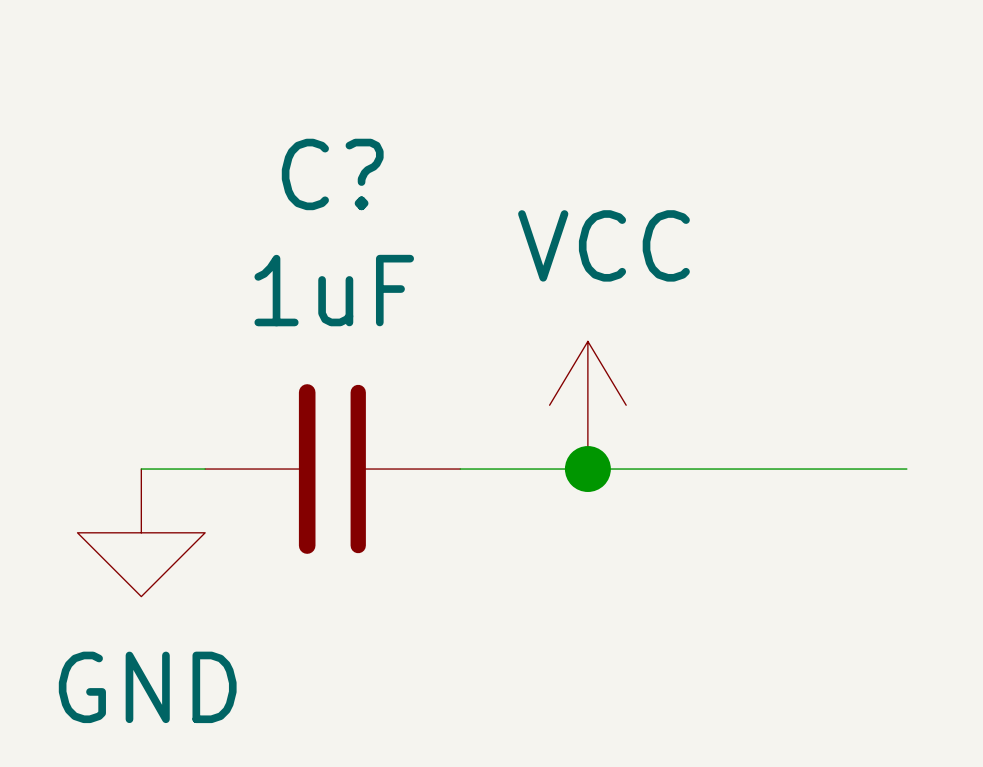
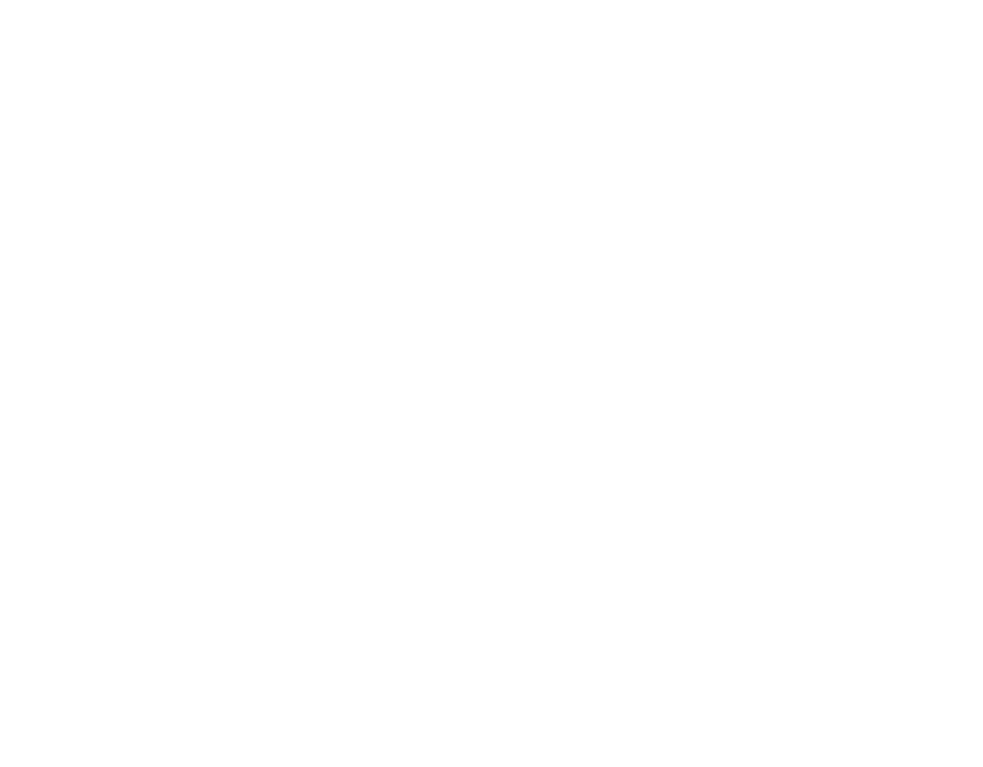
power symbol: VCC (587, 405) -> none
wire: (141, 469) (205, 469) -> none
C?: 1uF (332, 469) -> none
wire: (460, 469) (906, 469) -> none
junction: (587, 469) -> none
power symbol: GND (141, 532) -> none

